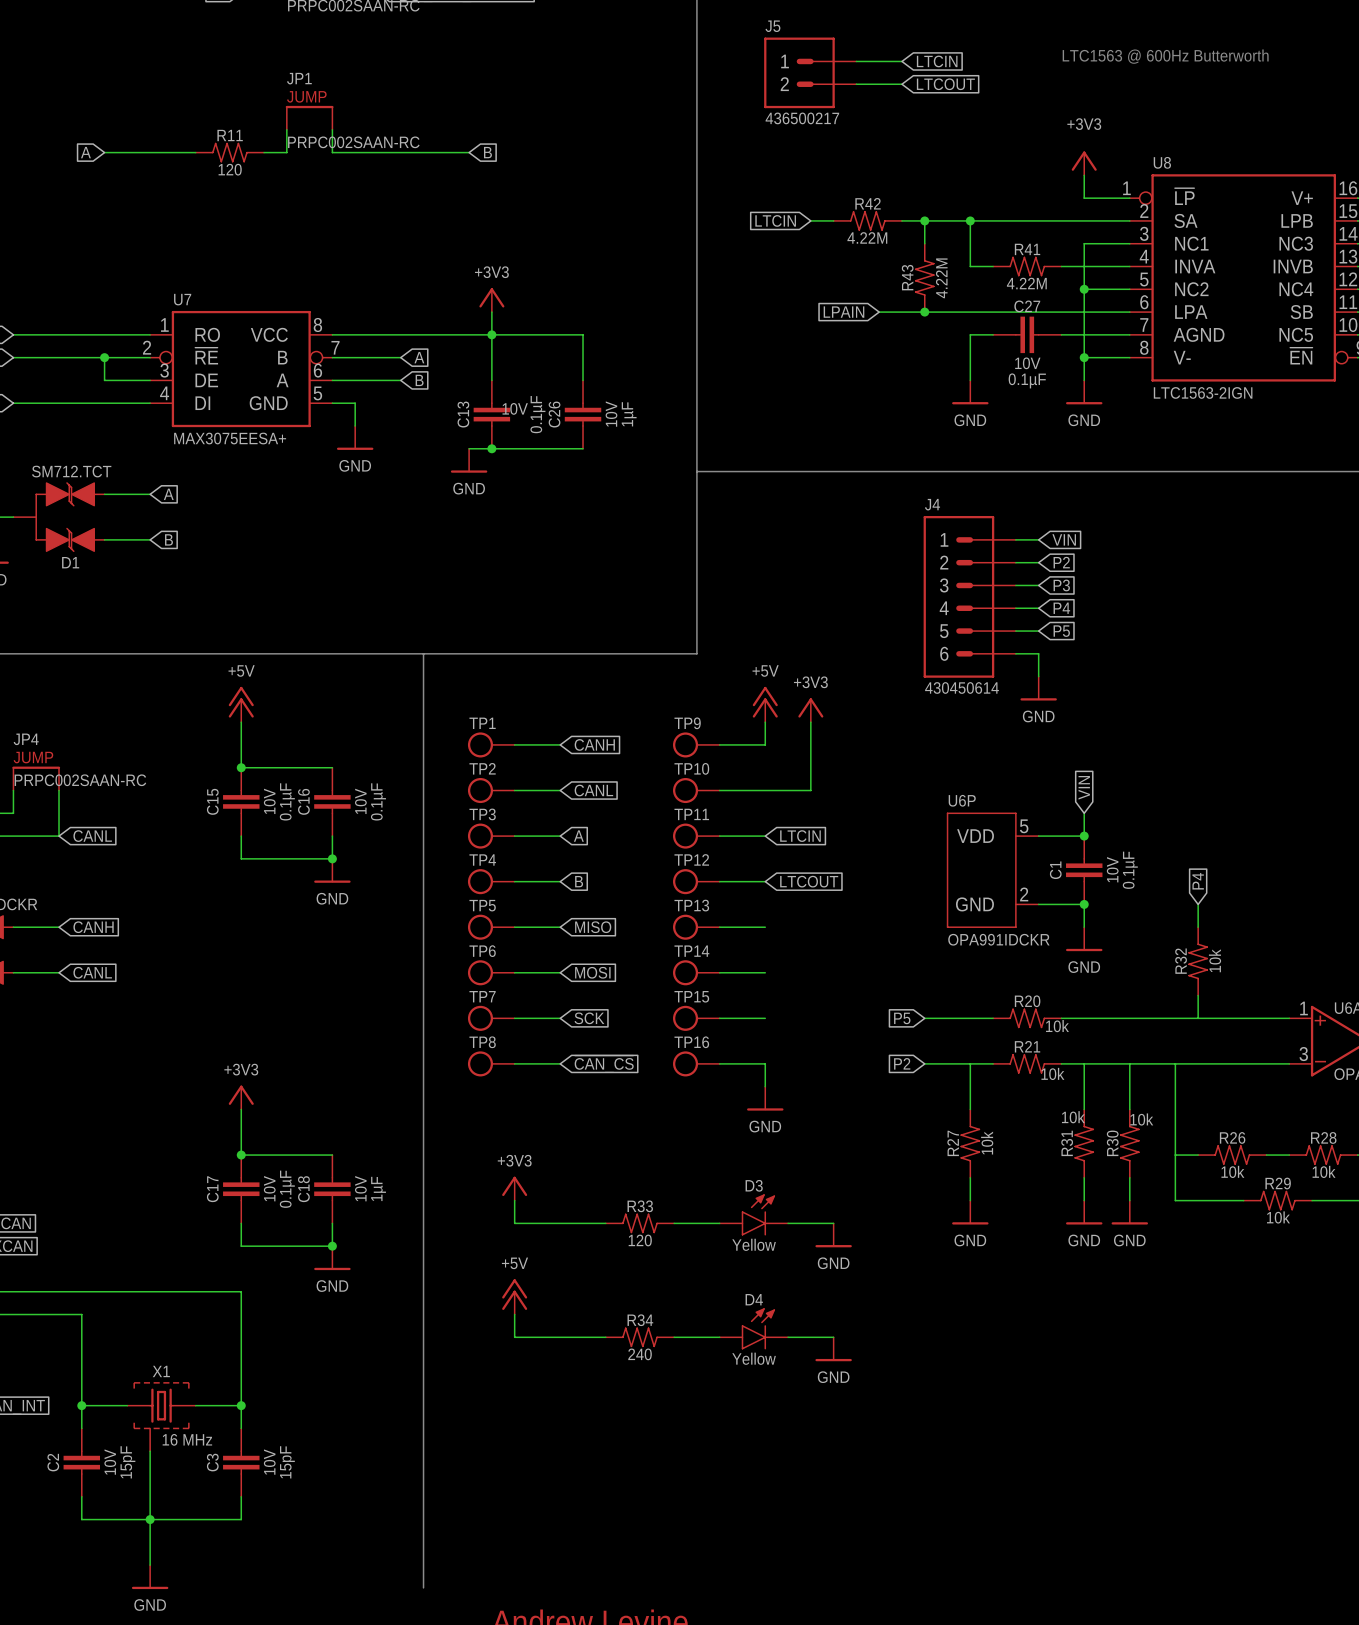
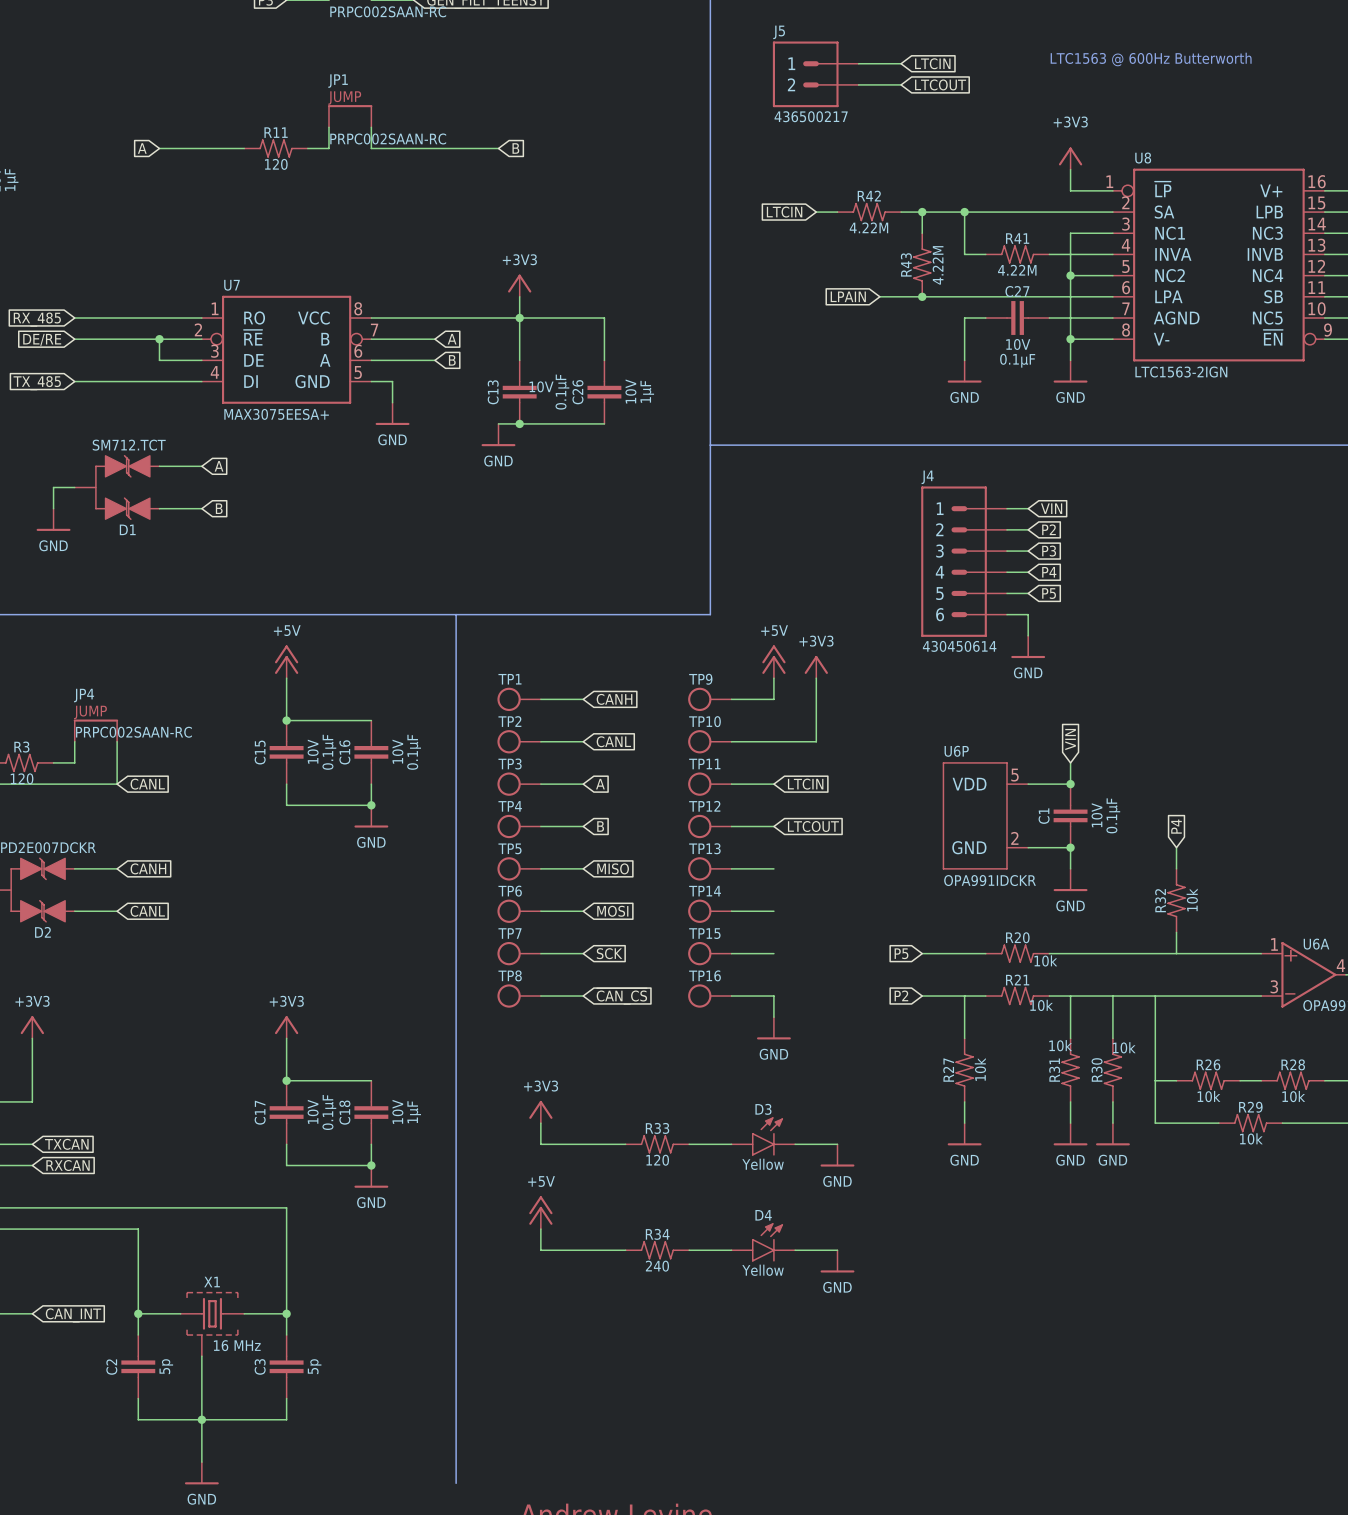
C2 text: 10V (110, 1462) -> none
C2 value: none -> 5p (166, 1366)
C2 text: 15pF (127, 1462) -> none
C3 text: 10V (269, 1462) -> none
C3 value: none -> 5p (314, 1366)
C3 text: 15pF (287, 1462) -> none

